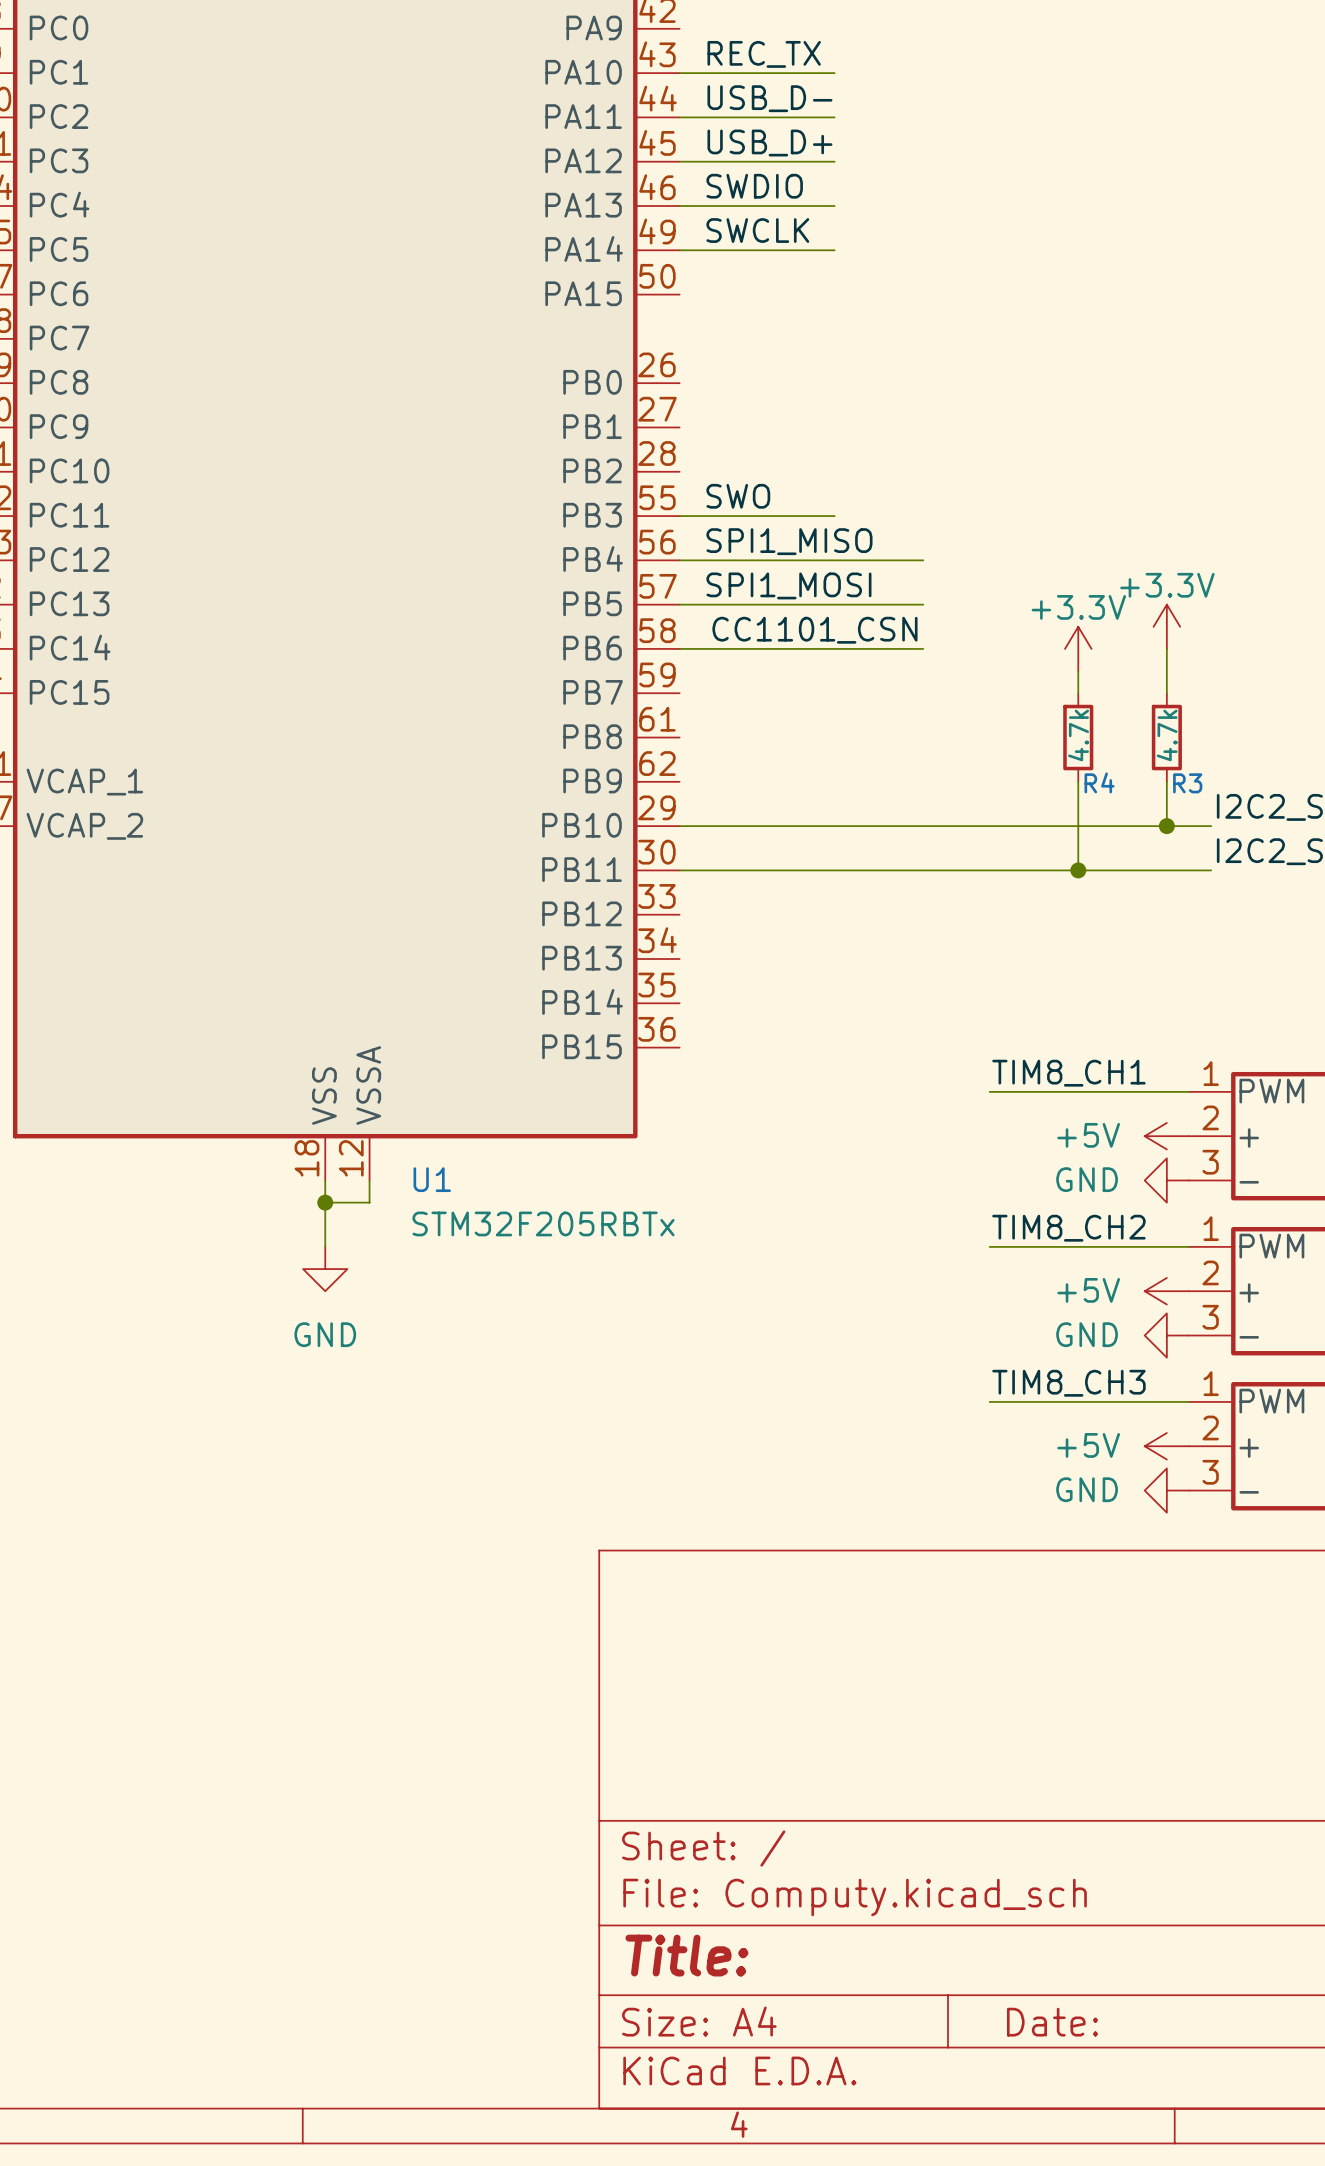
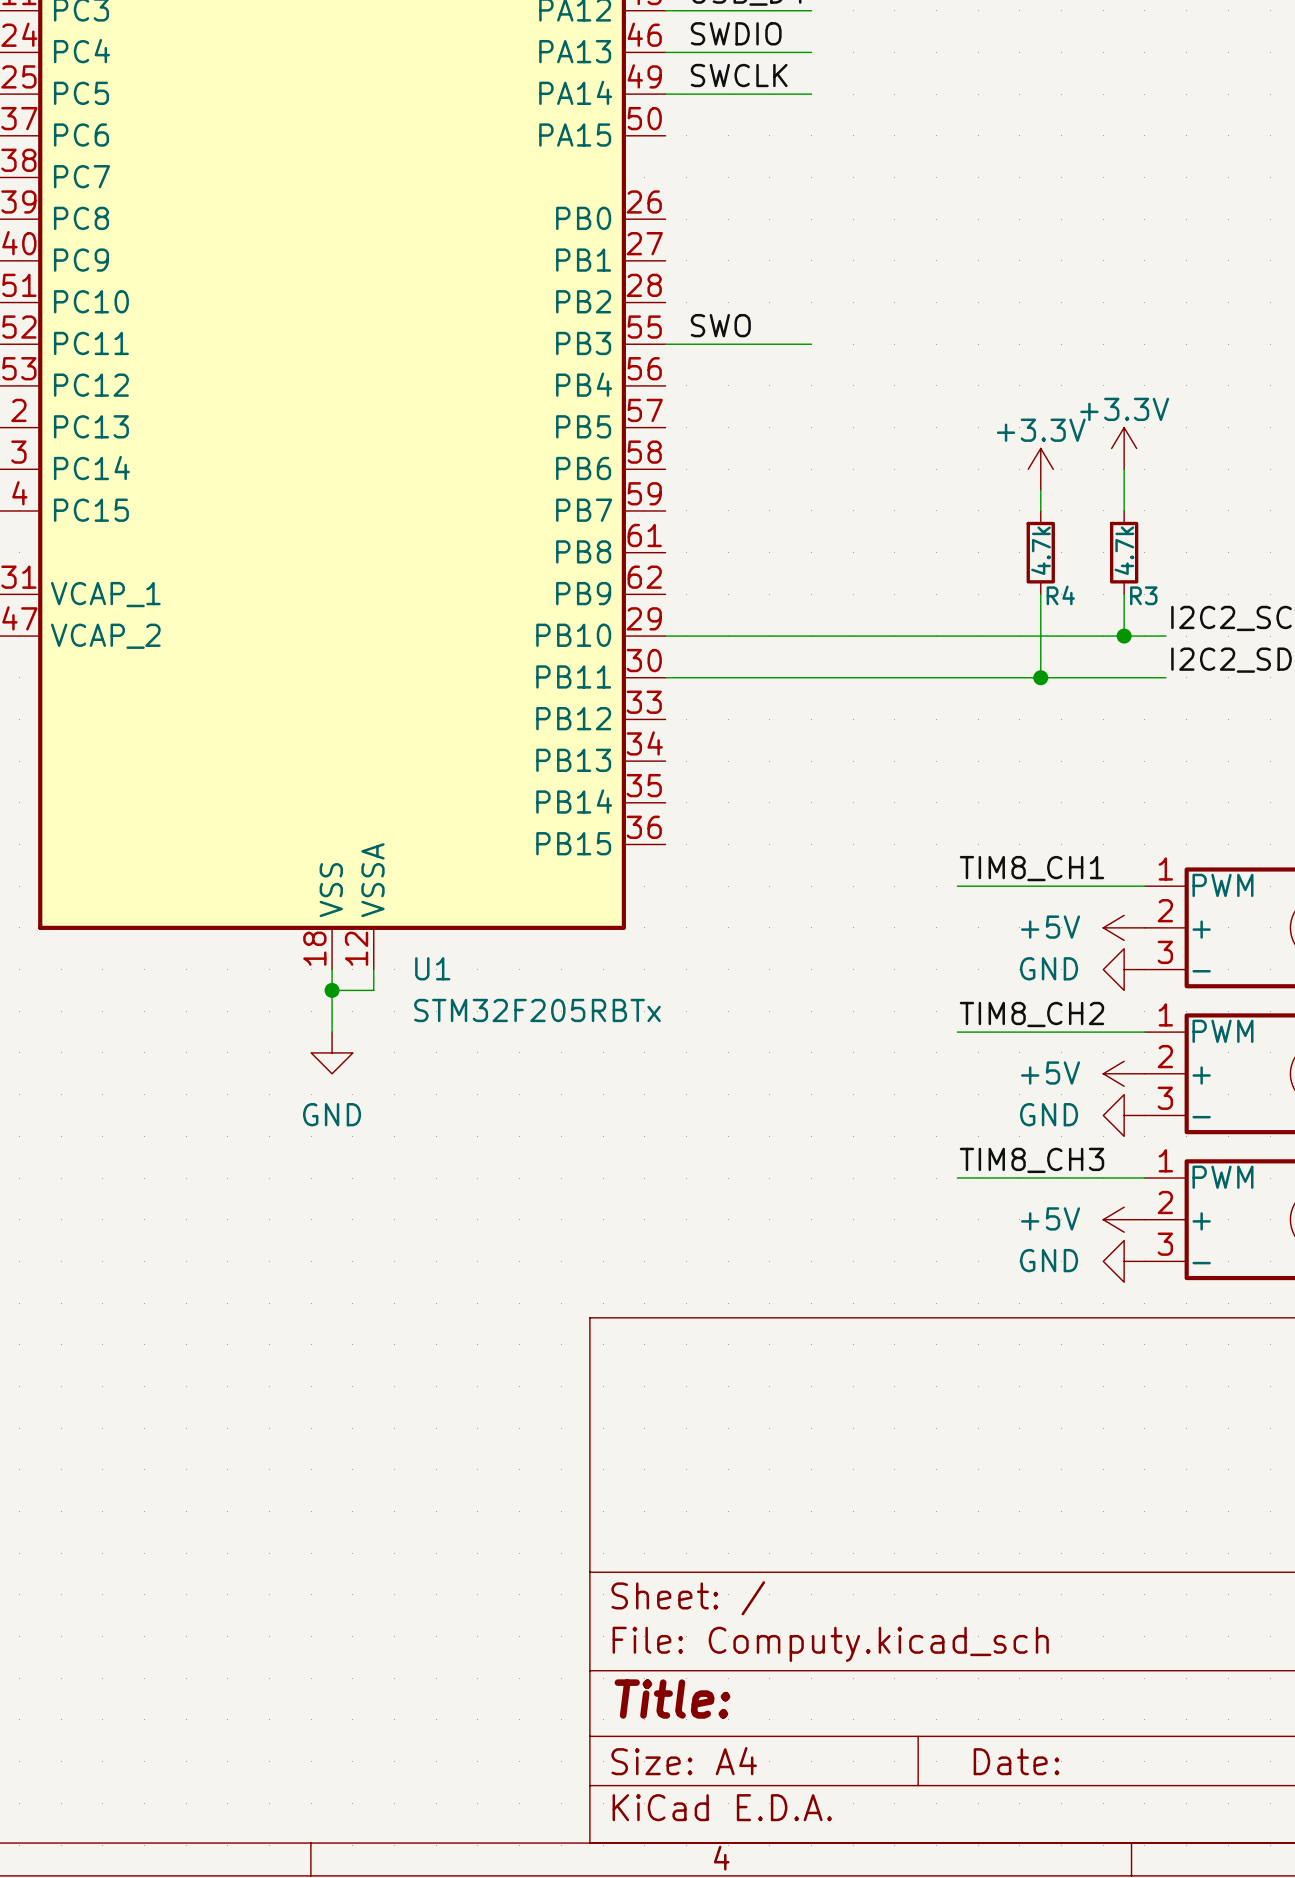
label: SPI1_MISO (789, 541) -> none
wire: (679, 560) (923, 560) -> none
label: SPI1_MOSI (788, 585) -> none
wire: (679, 604) (923, 604) -> none
label: CC1101_CSN (814, 630) -> none
wire: (679, 648) (923, 648) -> none

